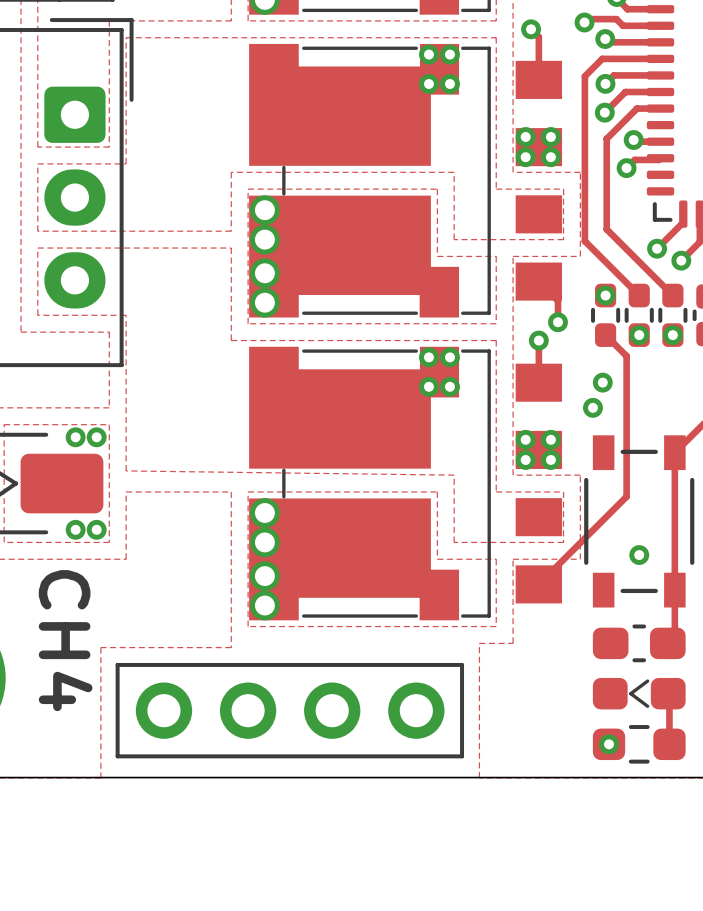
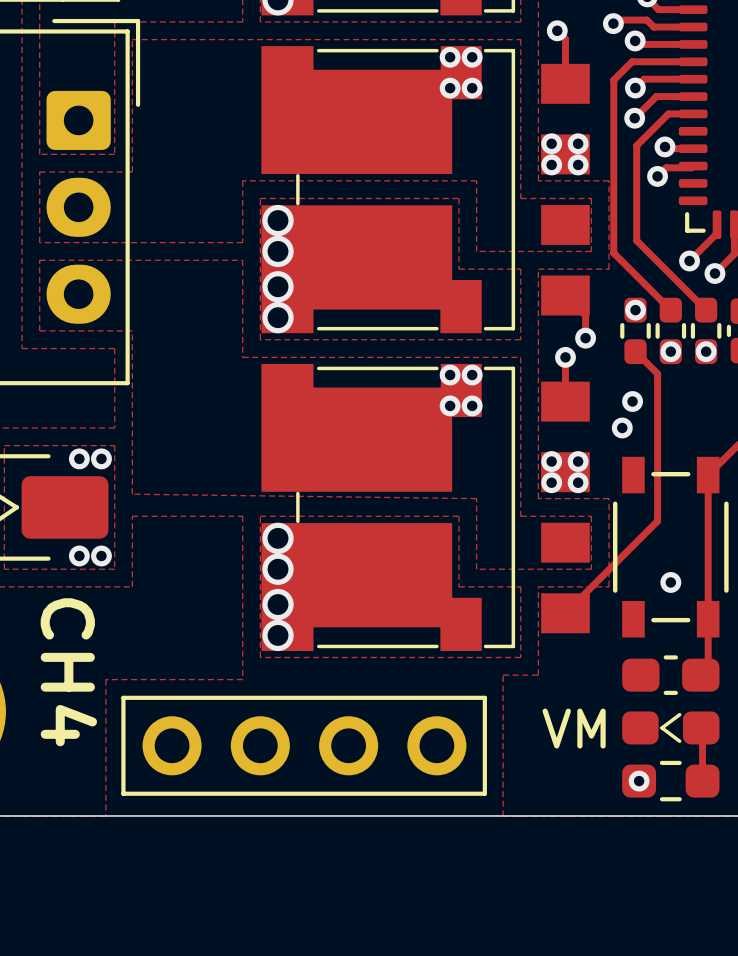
text: none -> VM (574, 728)

